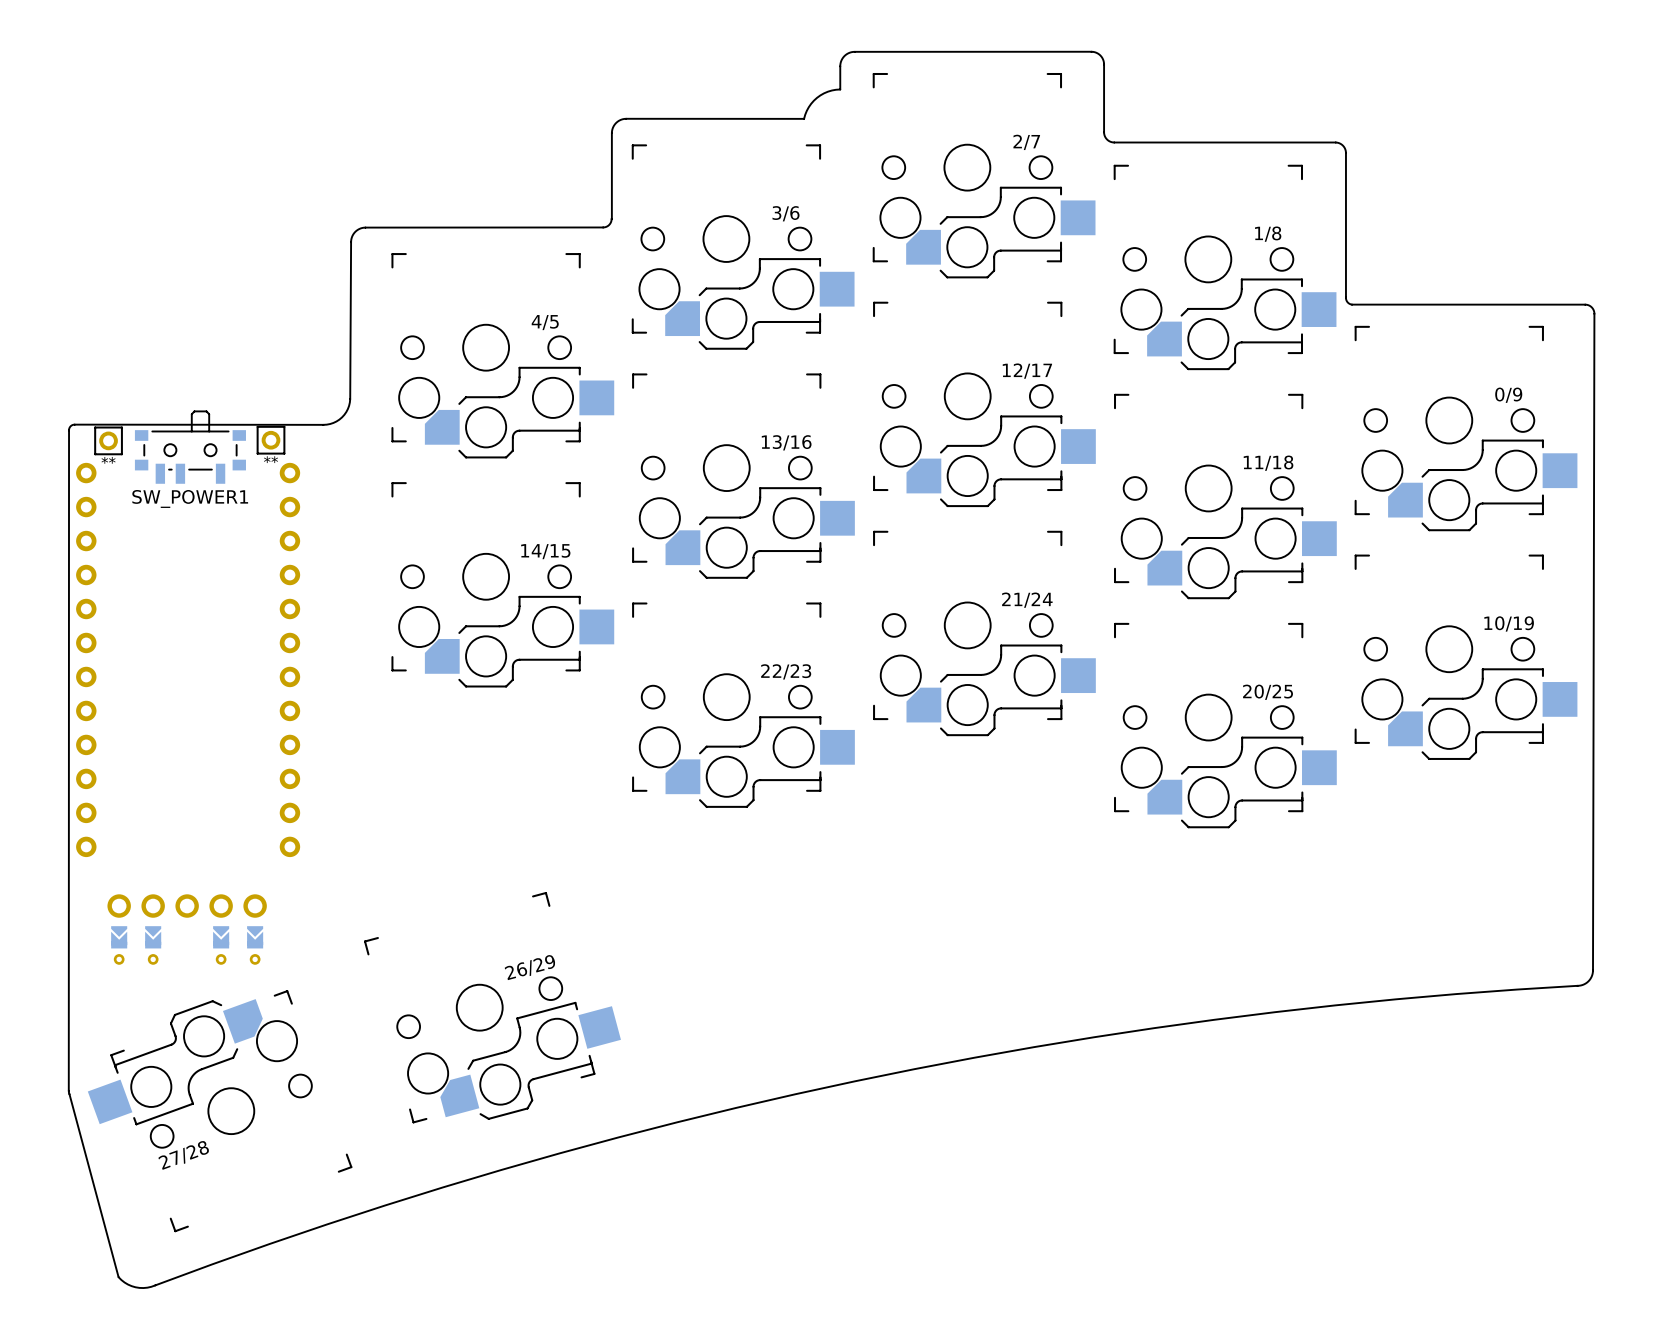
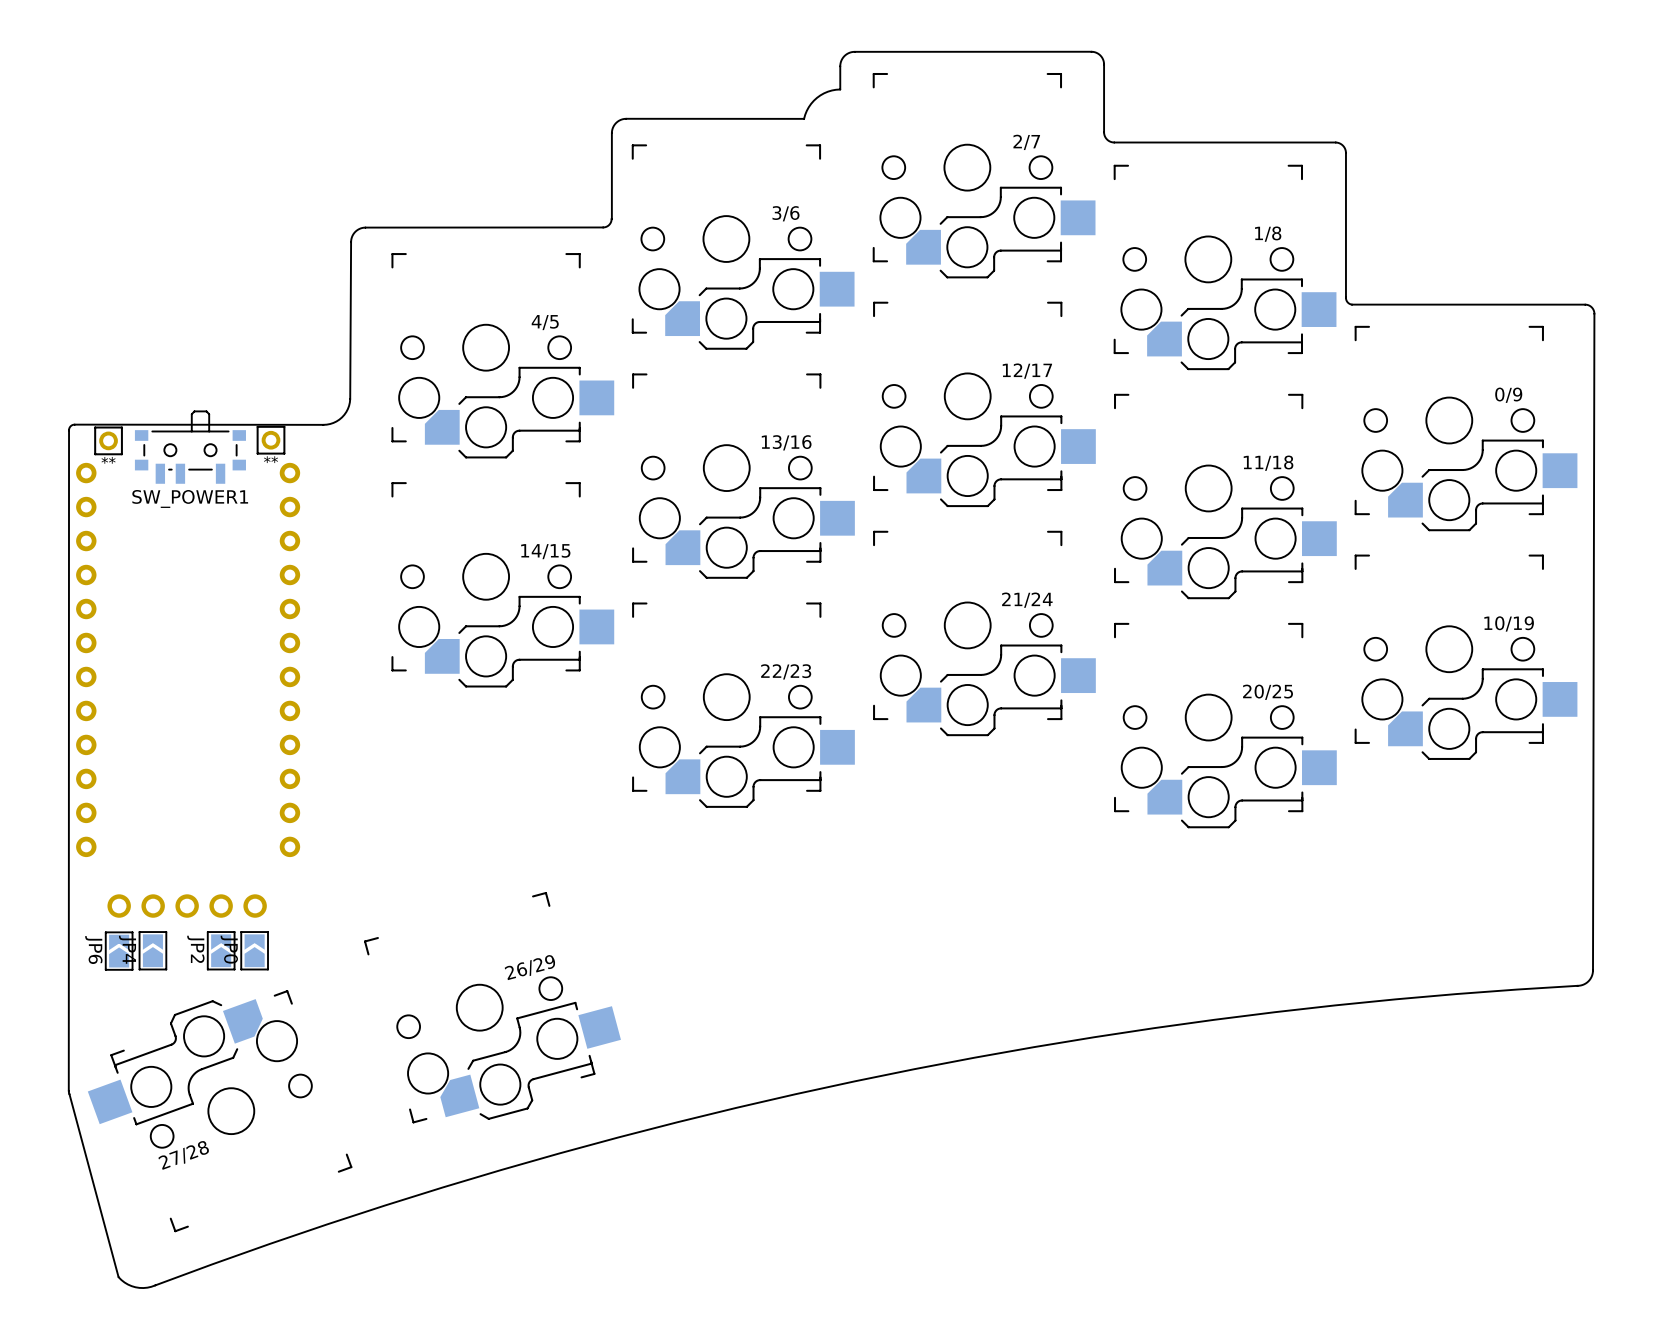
part: (187, 929) -> none
JP4: none -> (152, 950)
JP2: none -> (221, 950)
JP0: none -> (254, 950)
JP6: none -> (119, 951)

